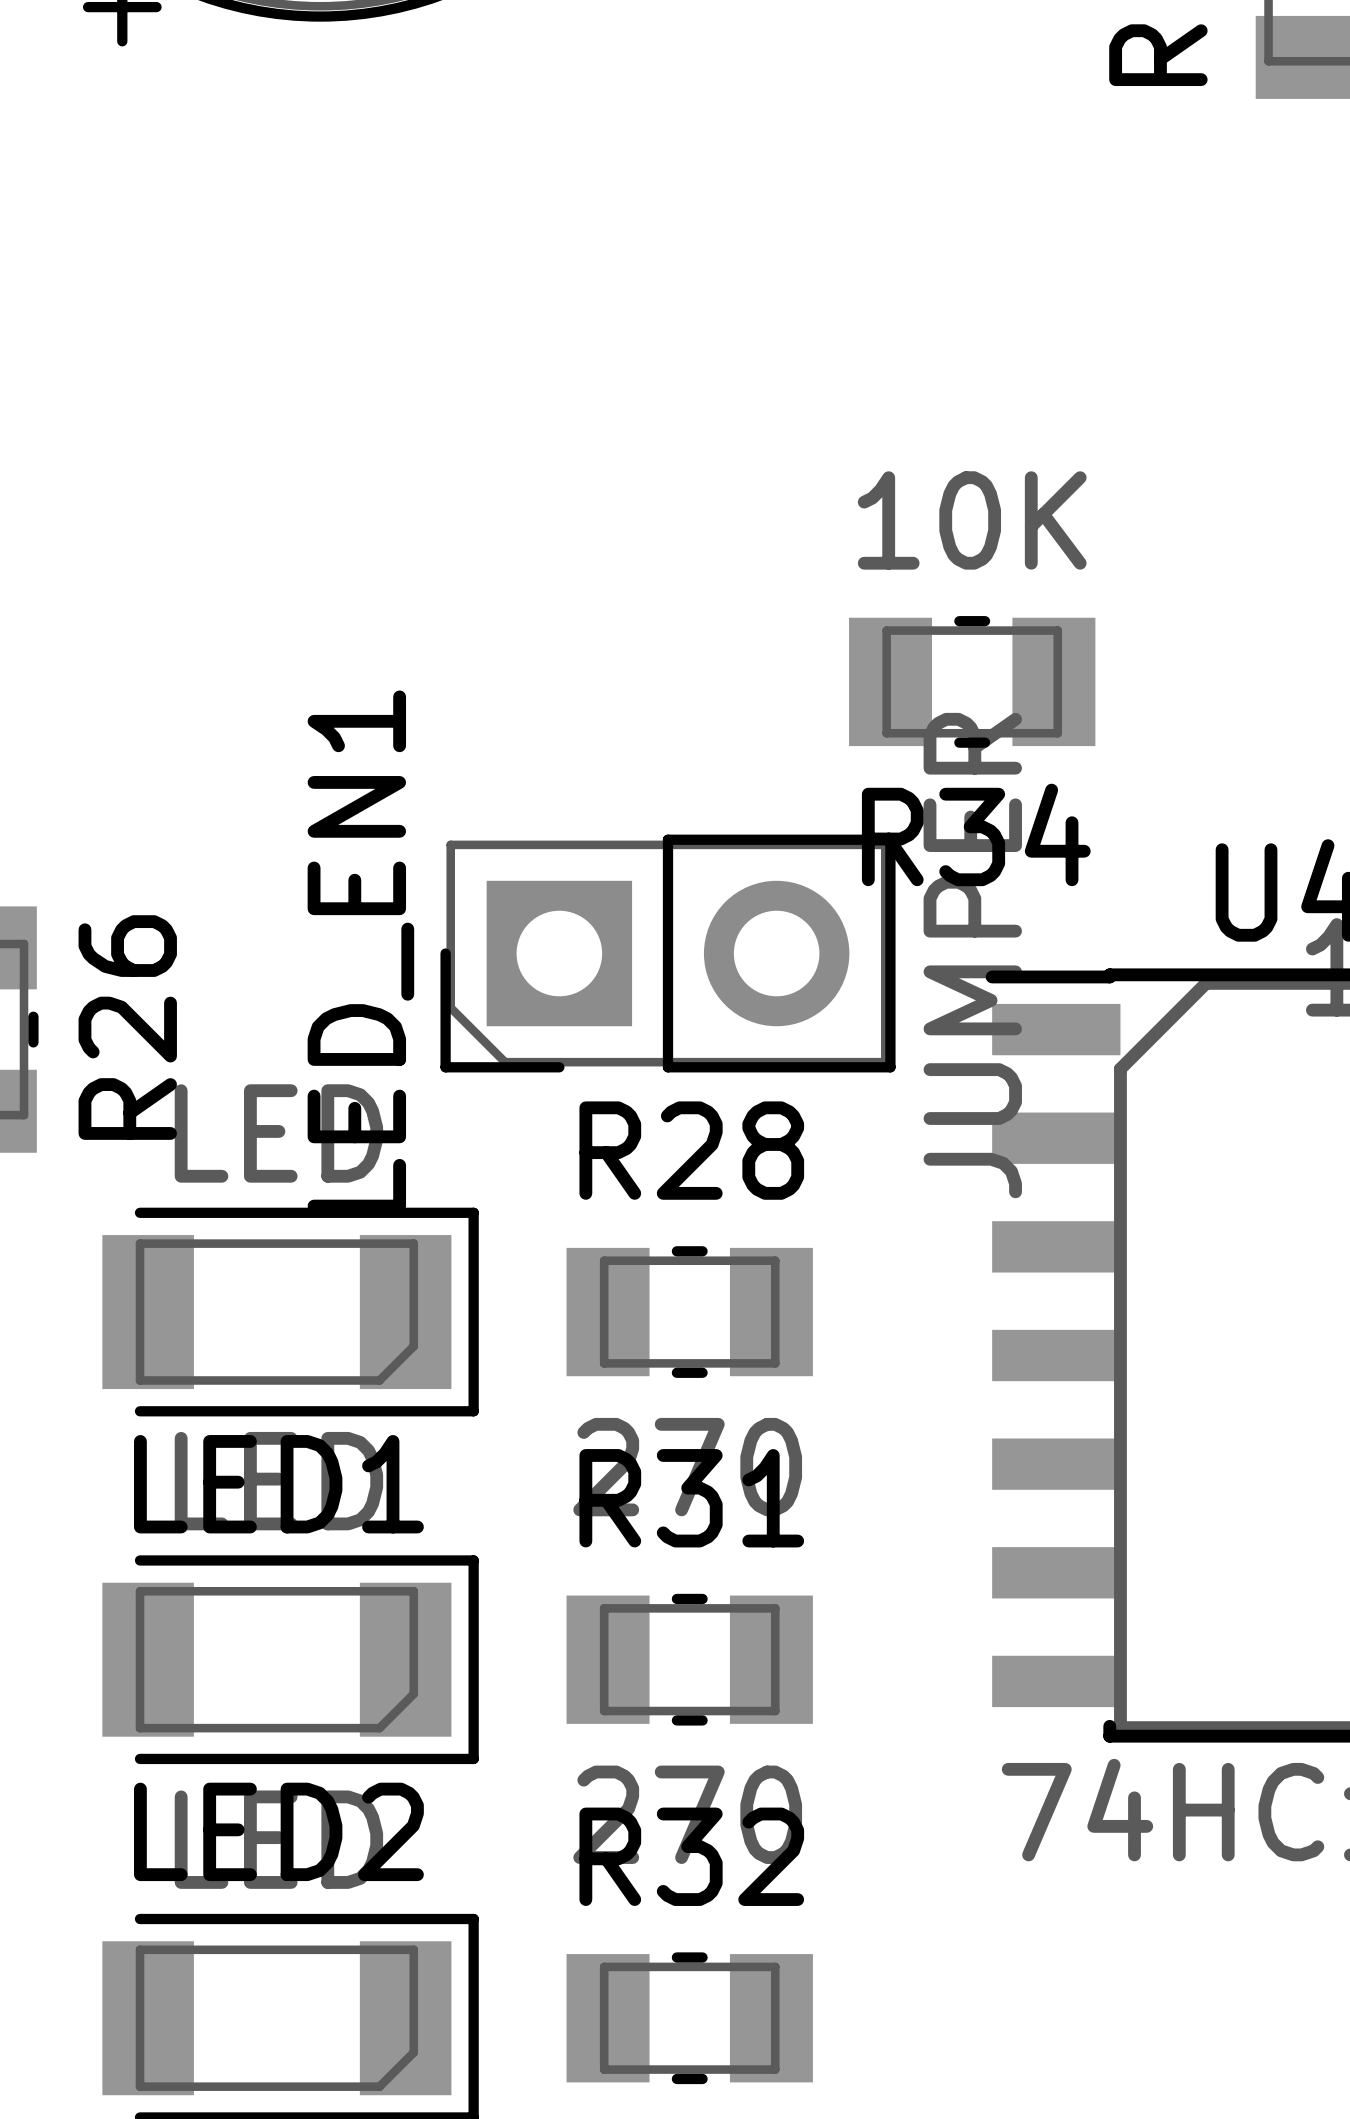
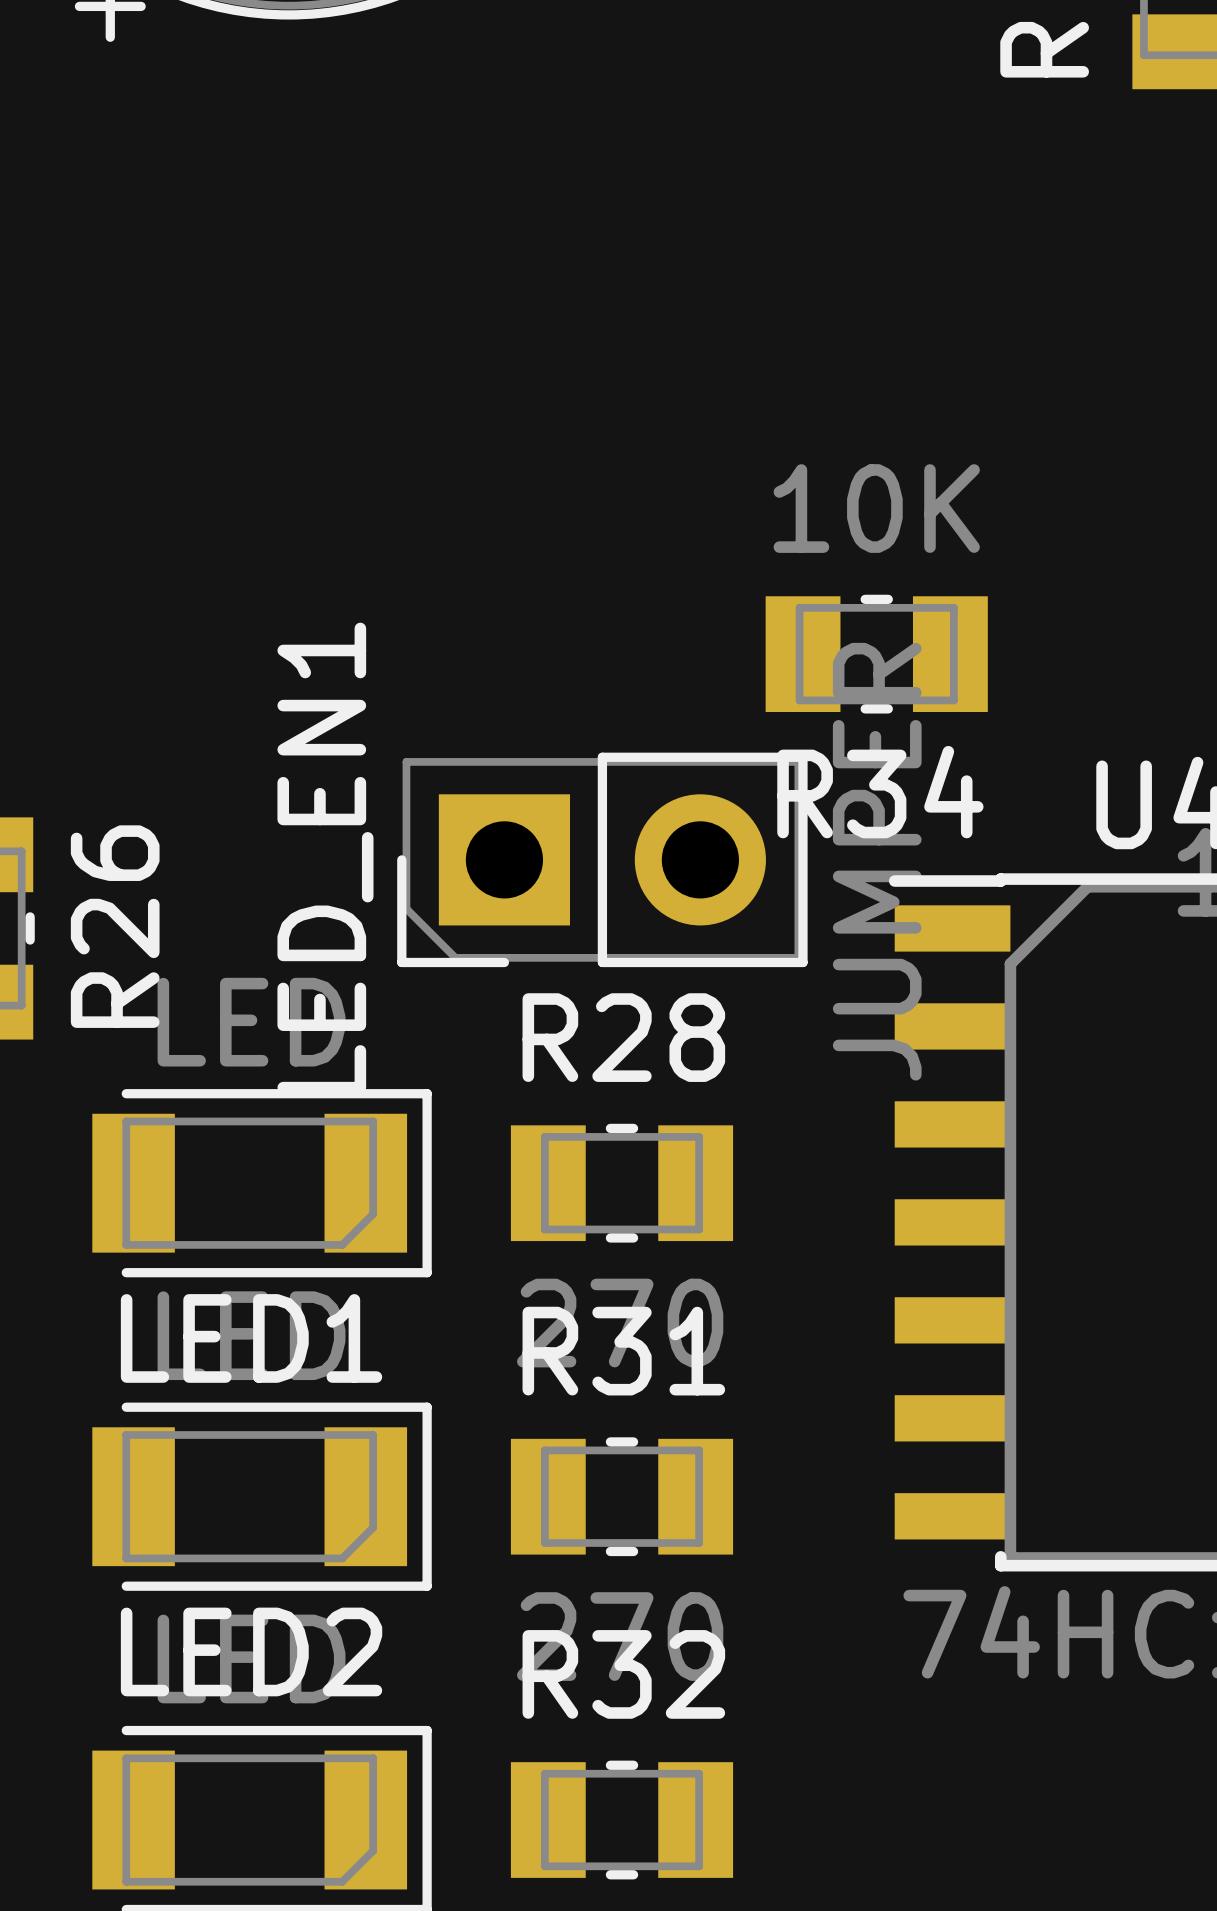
R34 position: (972, 681) -> (876, 654)

